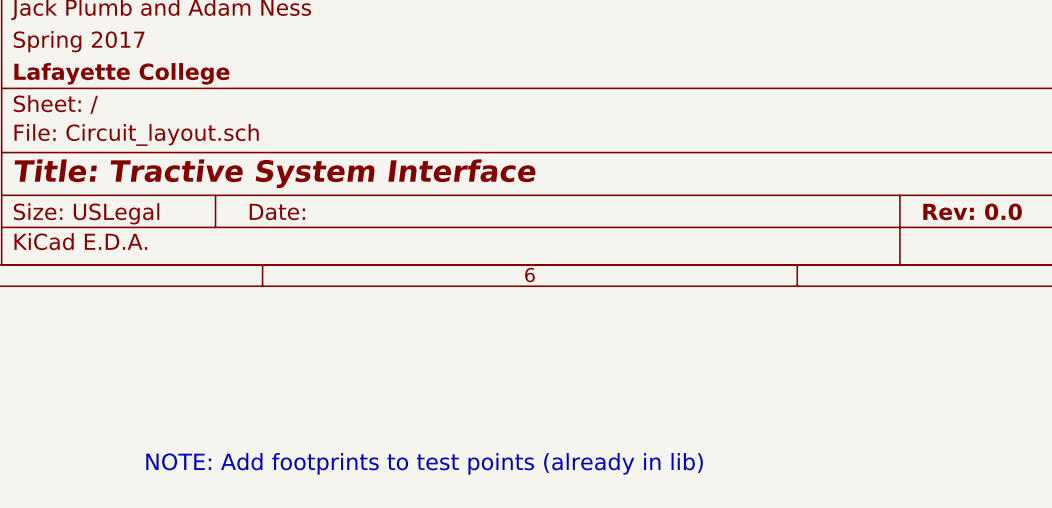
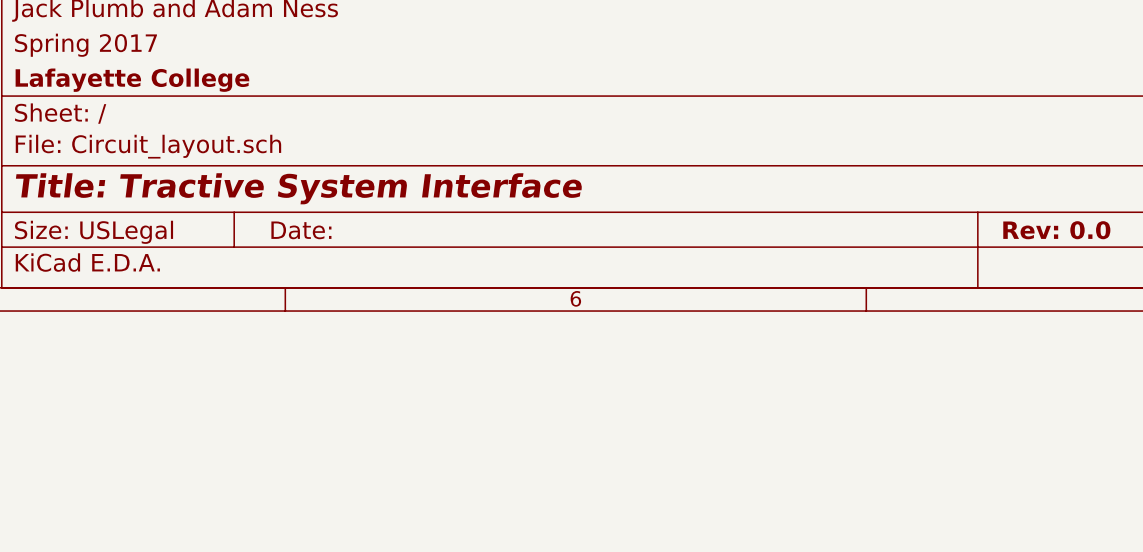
text: NOTE: Add footprints to test points (already in lib) (424, 463) -> none

